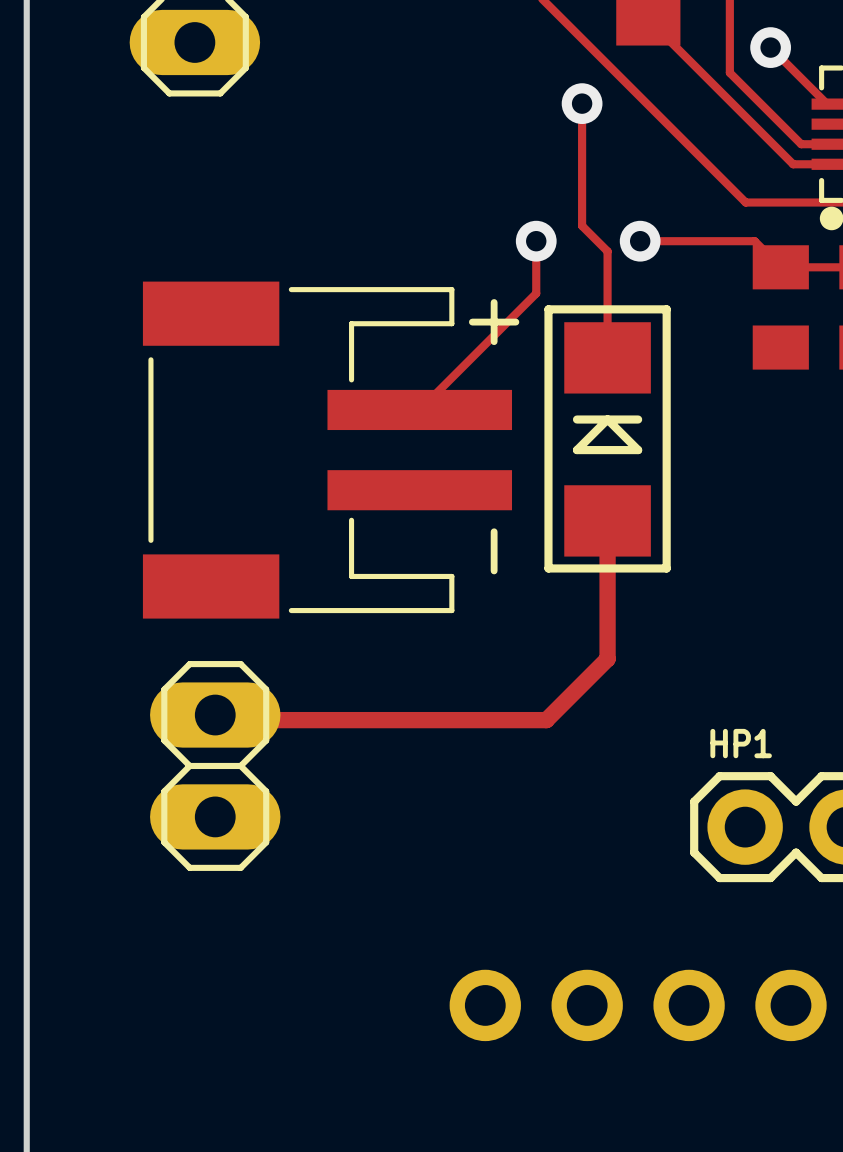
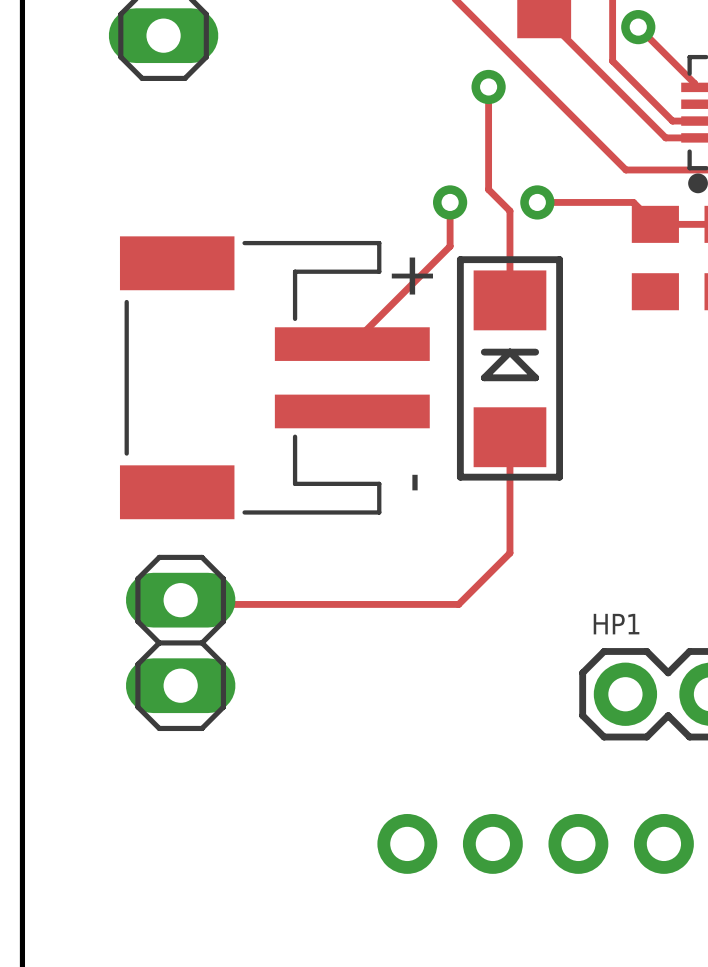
track: (770, 47) (827, 104) -> (638, 27) (694, 83) (694, 87)
via position: (770, 47) -> (638, 27)
track width: thick (607, 520) (607, 658) (546, 720) (220, 720) -> thin (509, 437) (509, 553) (458, 604) (184, 604)

